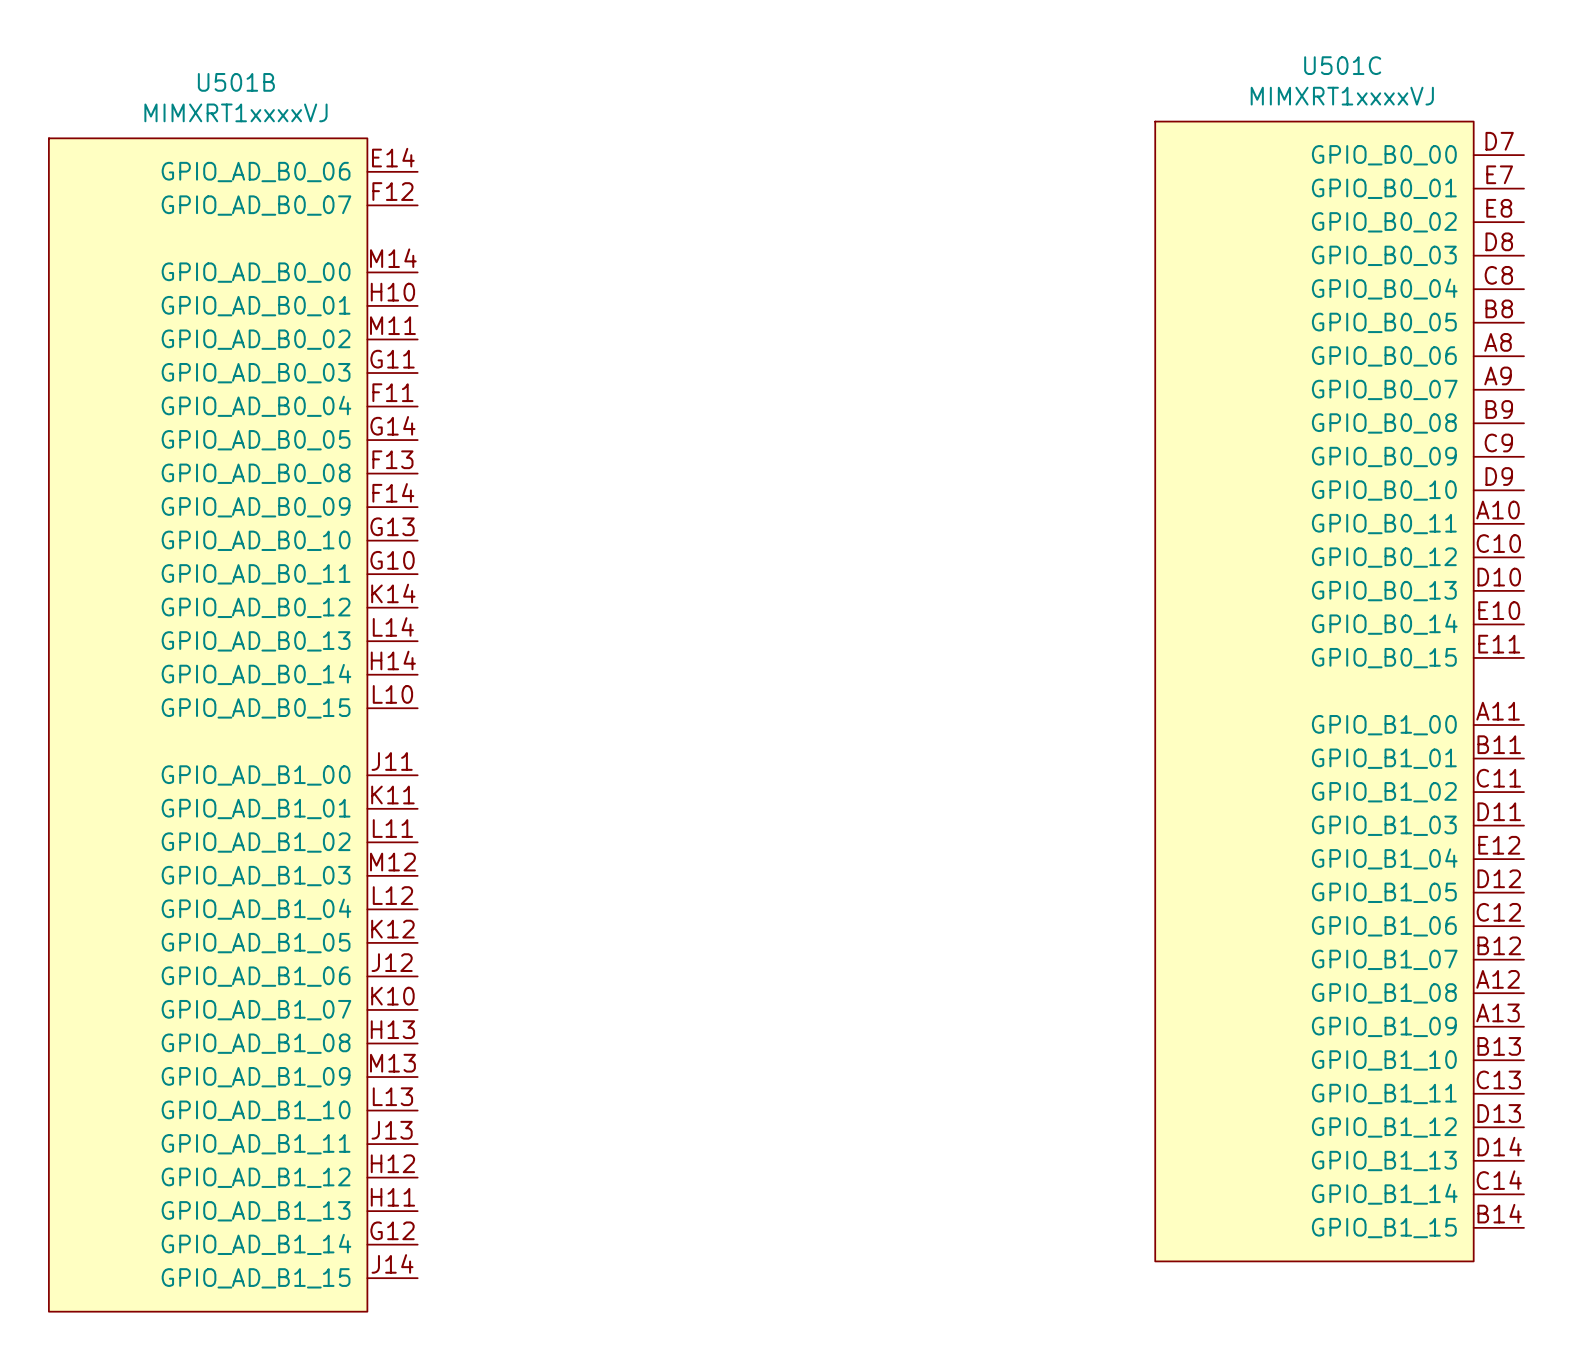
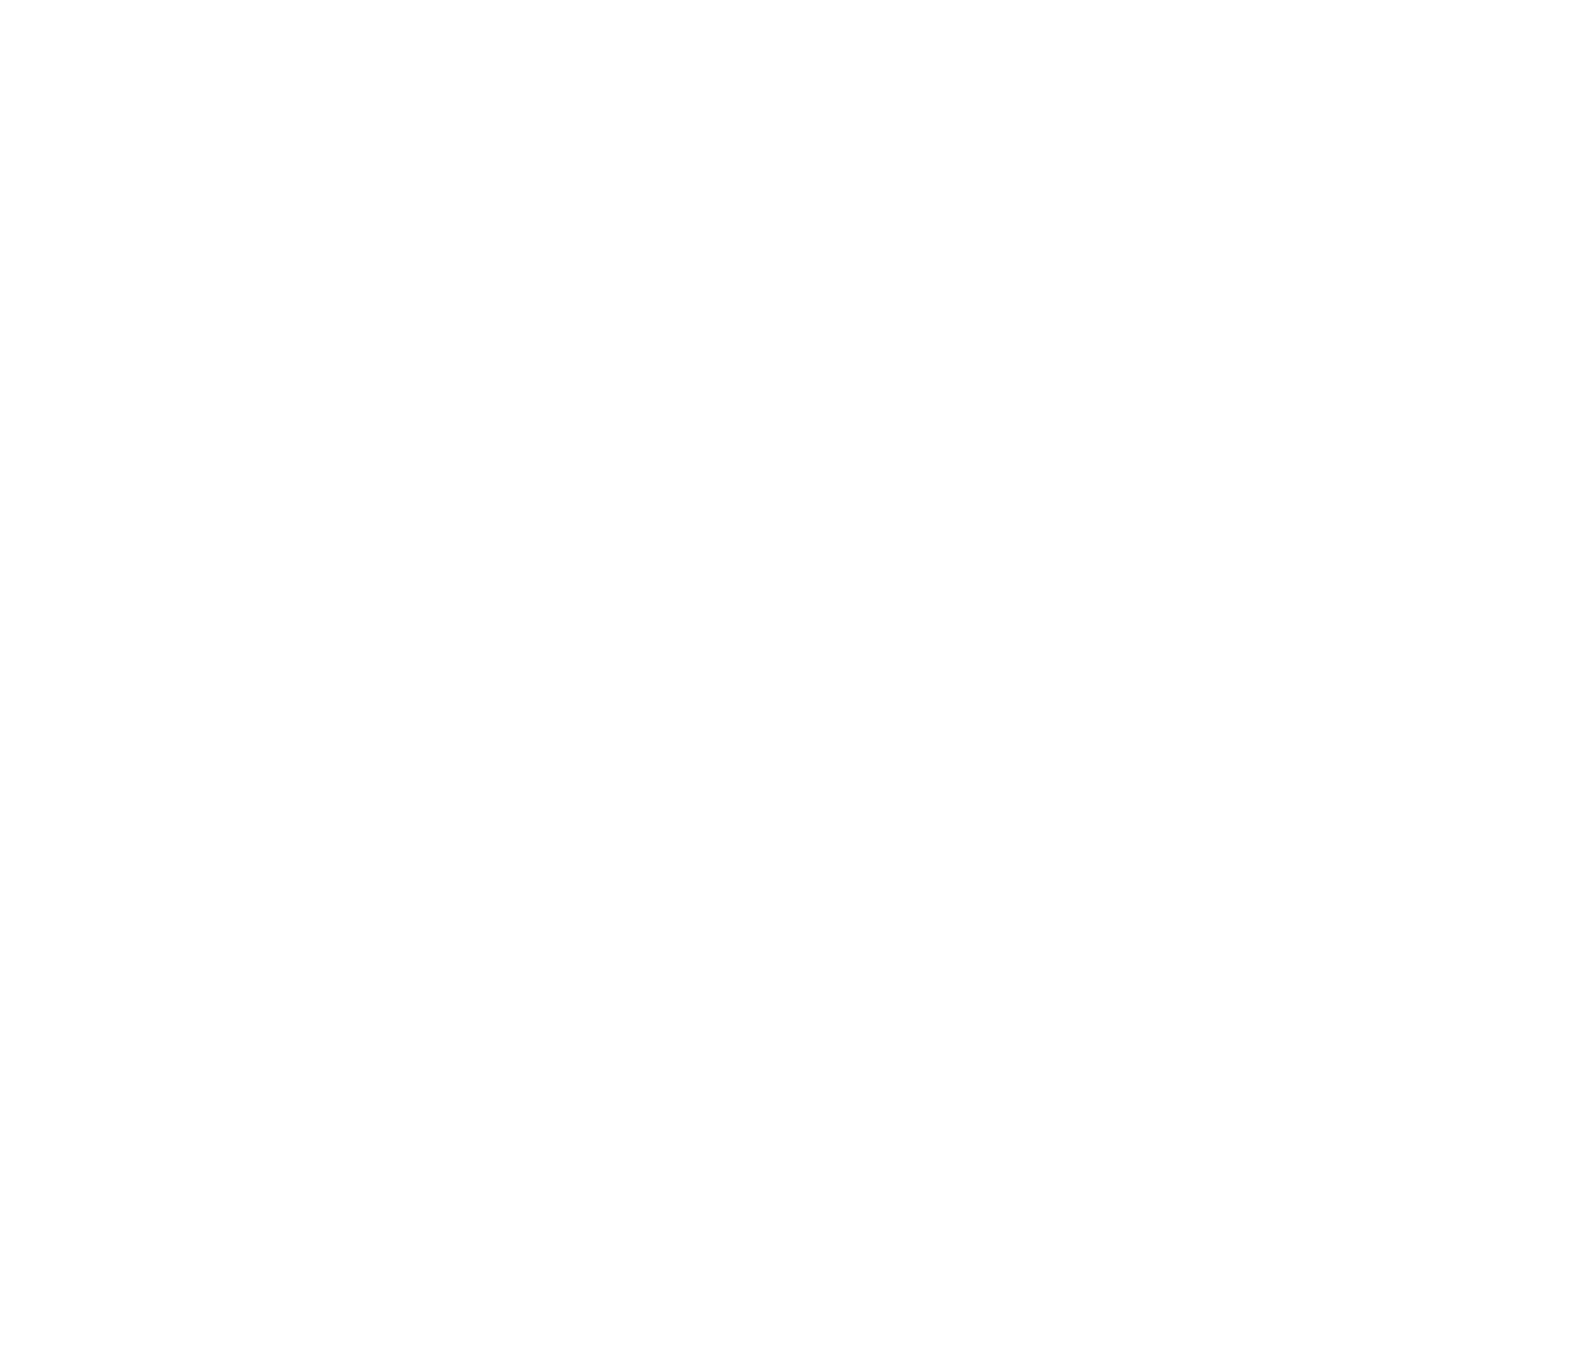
U501C: MIMXRT1xxxxVJ (1339, 691) -> none
U501B: MIMXRT1xxxxVJ (233, 725) -> none

